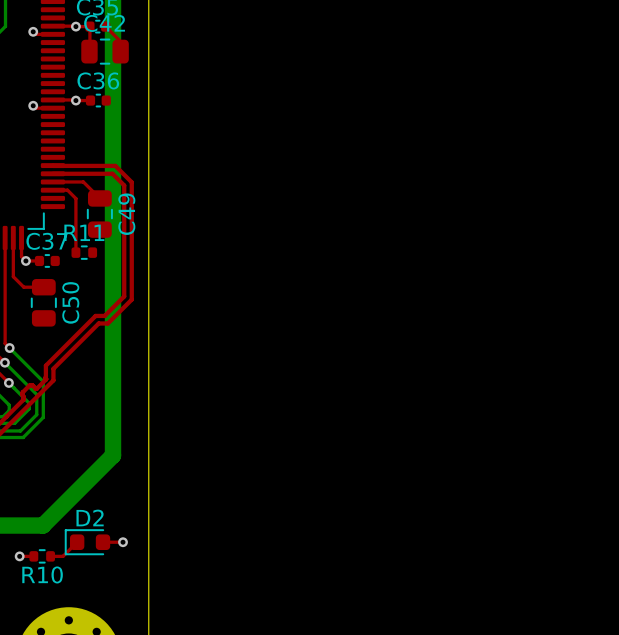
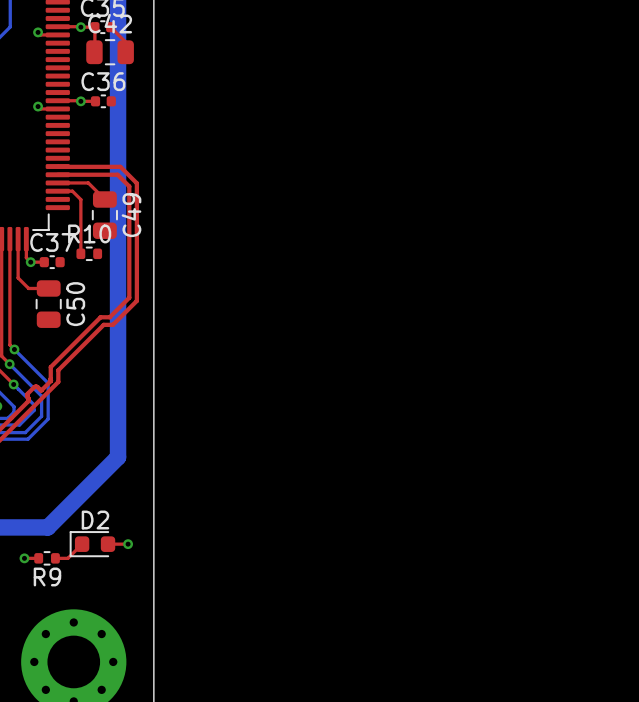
R11 name: R11 (84, 232) -> R10 (89, 233)
R10 name: R10 (42, 574) -> R9 (47, 576)

